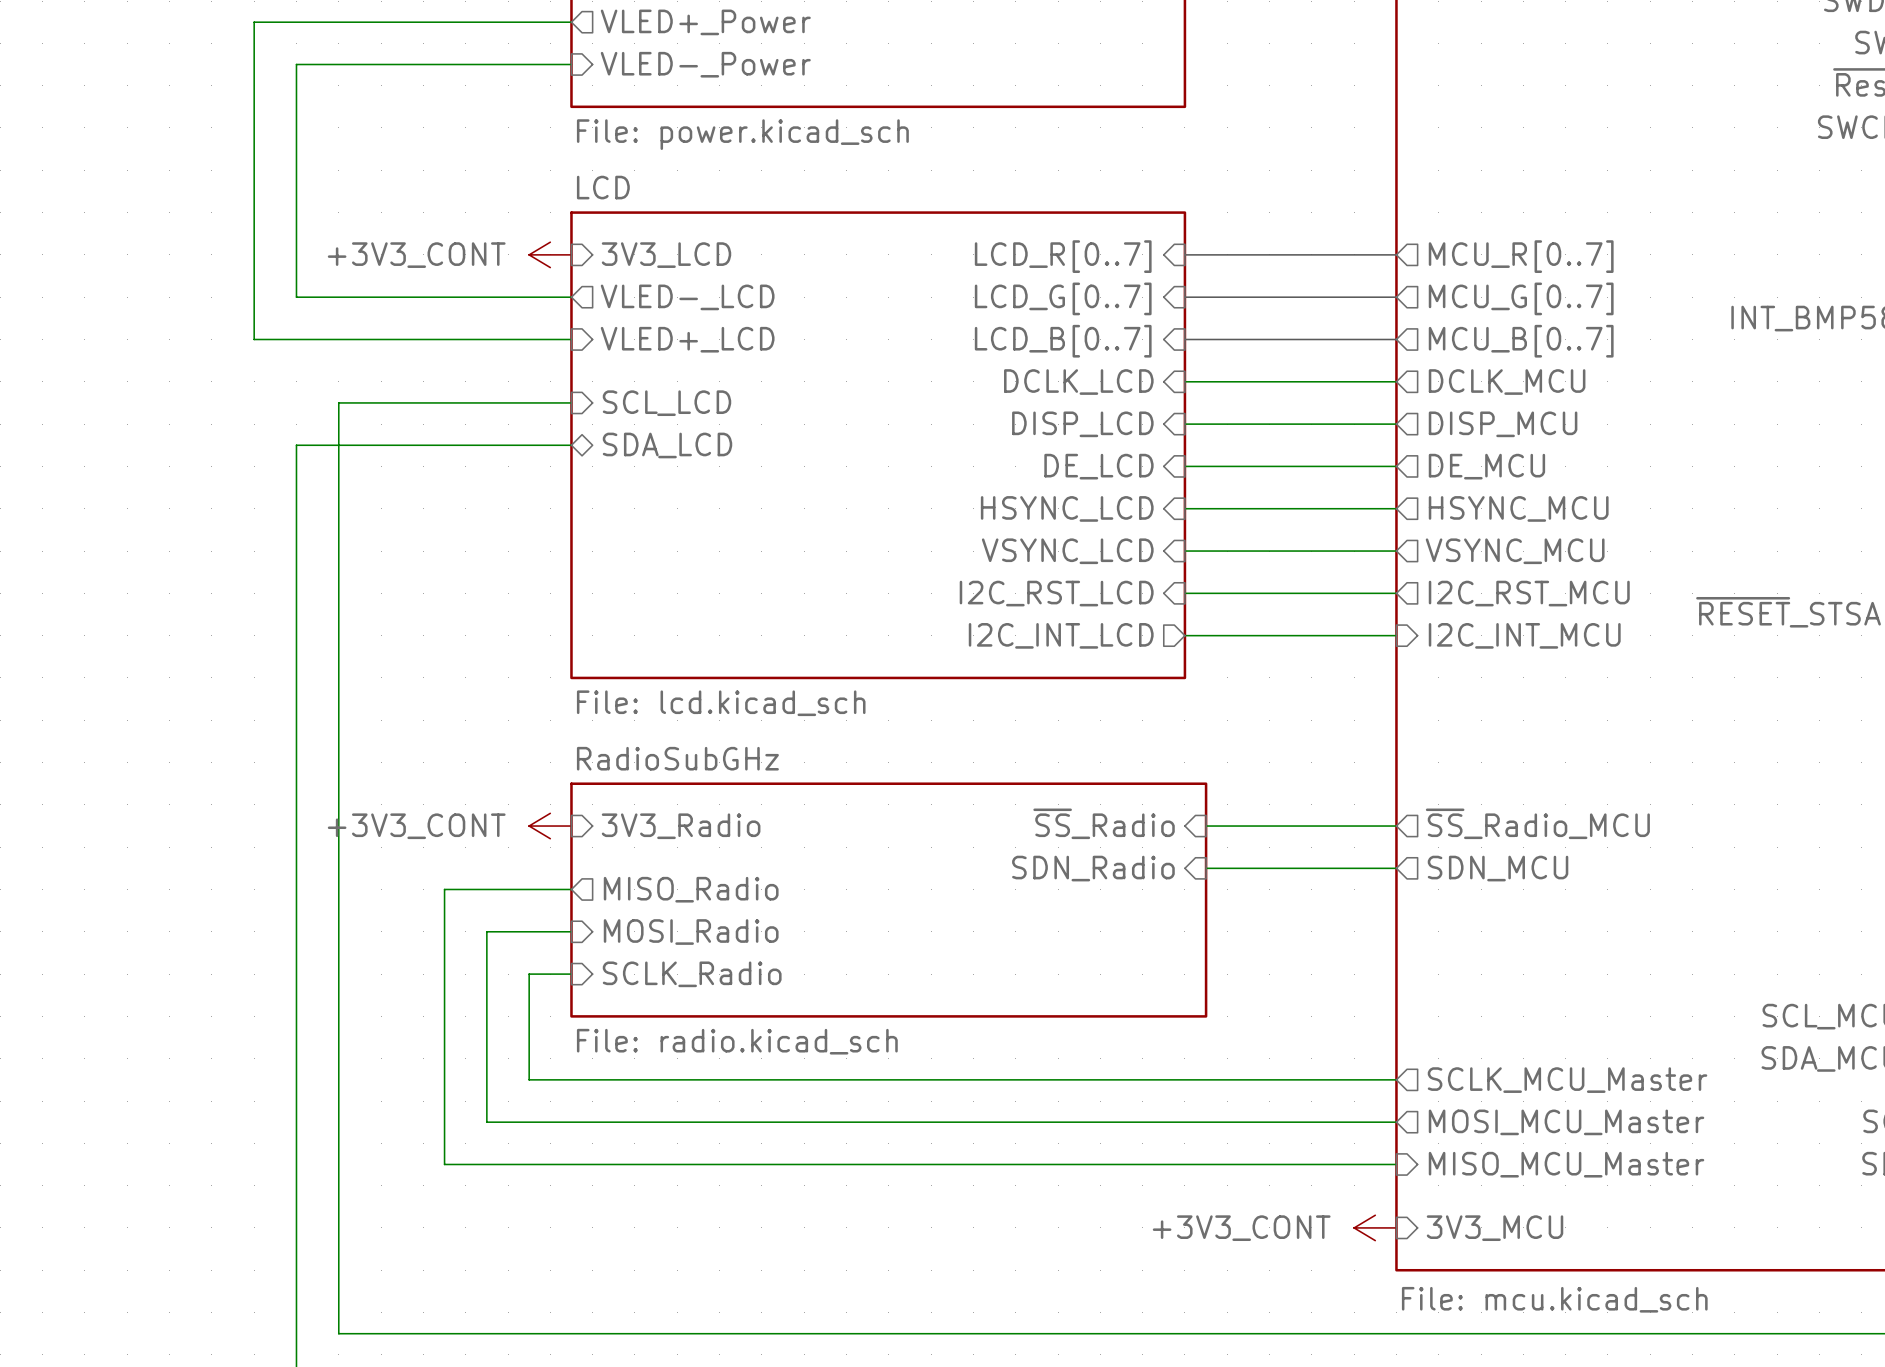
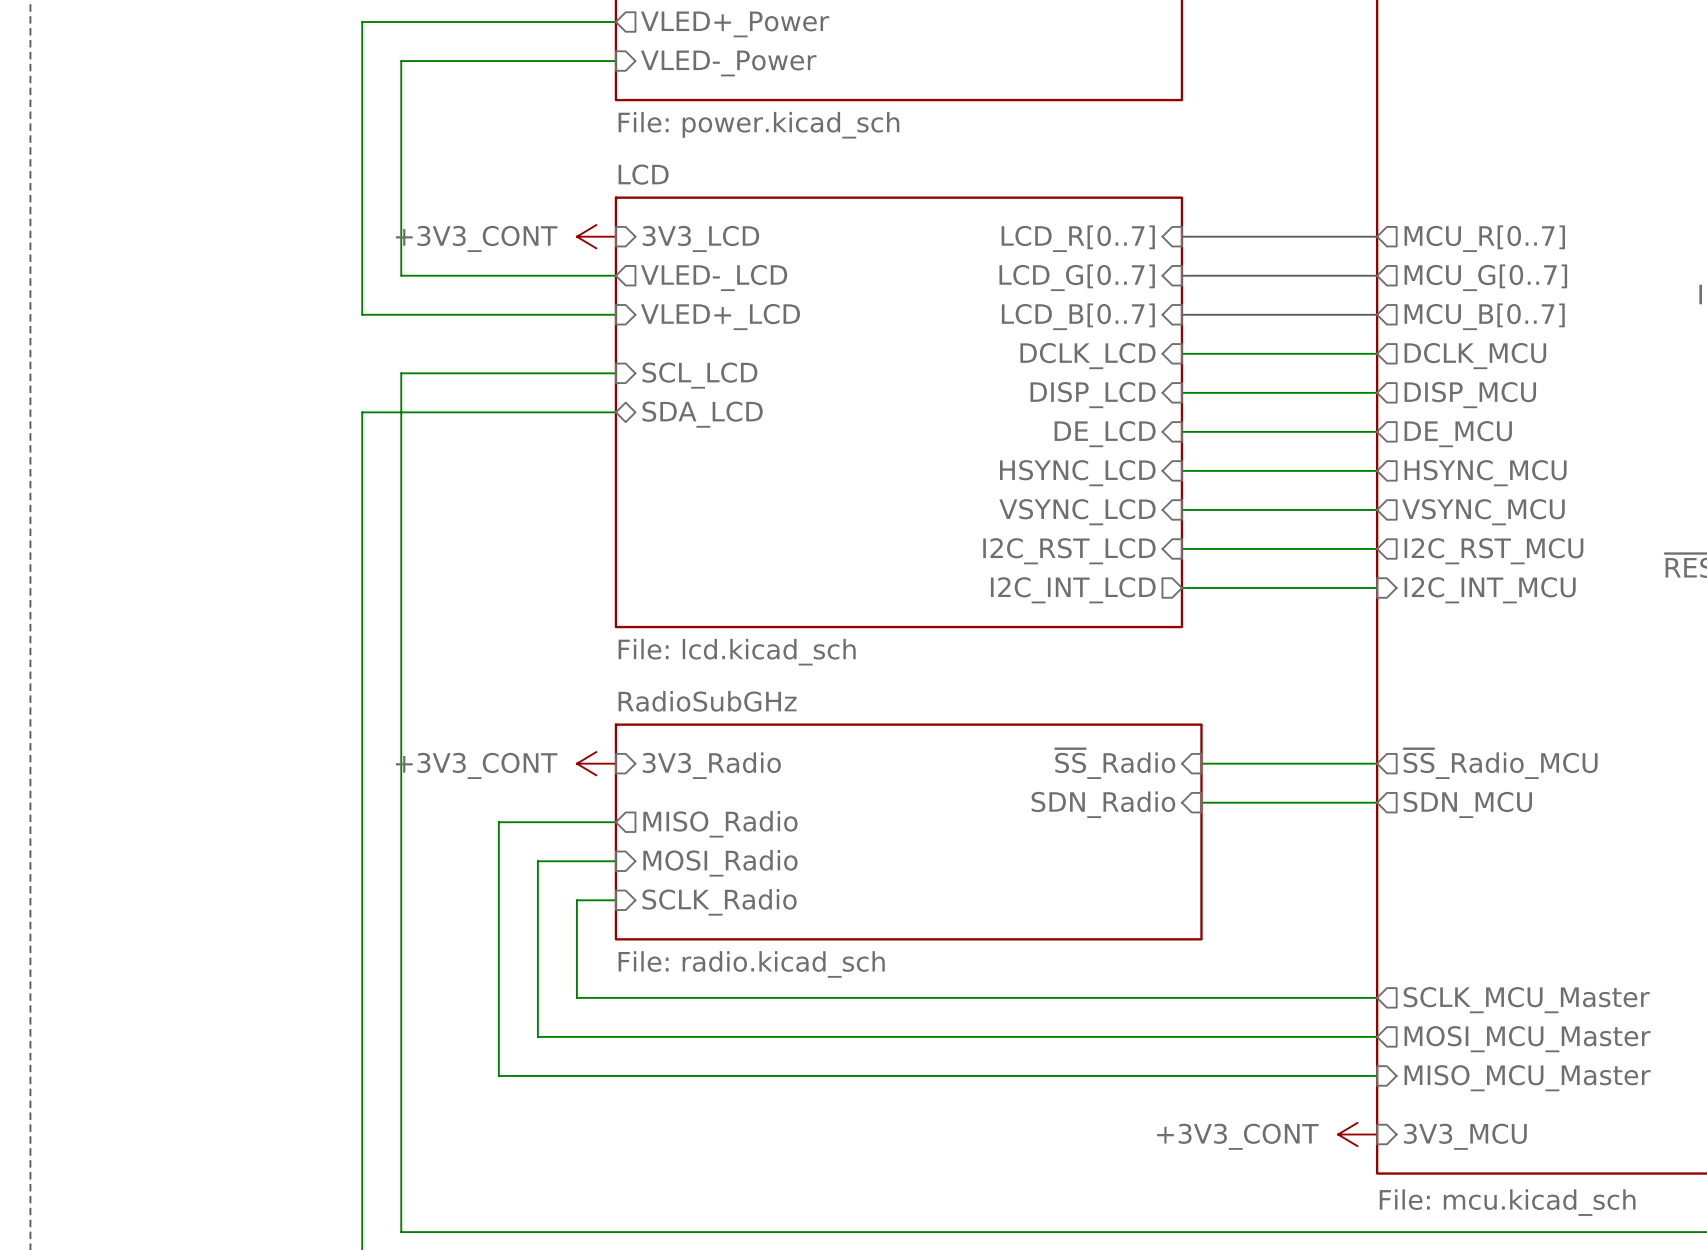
wire: (296, 22) (254, 22) (254, 339) (296, 339) -> none
wire: (296, 64) (338, 64) -> (362, 61) (362, 22)
wire: none -> (401, 61) (401, 275)
wire: (296, 297) (338, 297) -> (362, 275) (362, 314)

